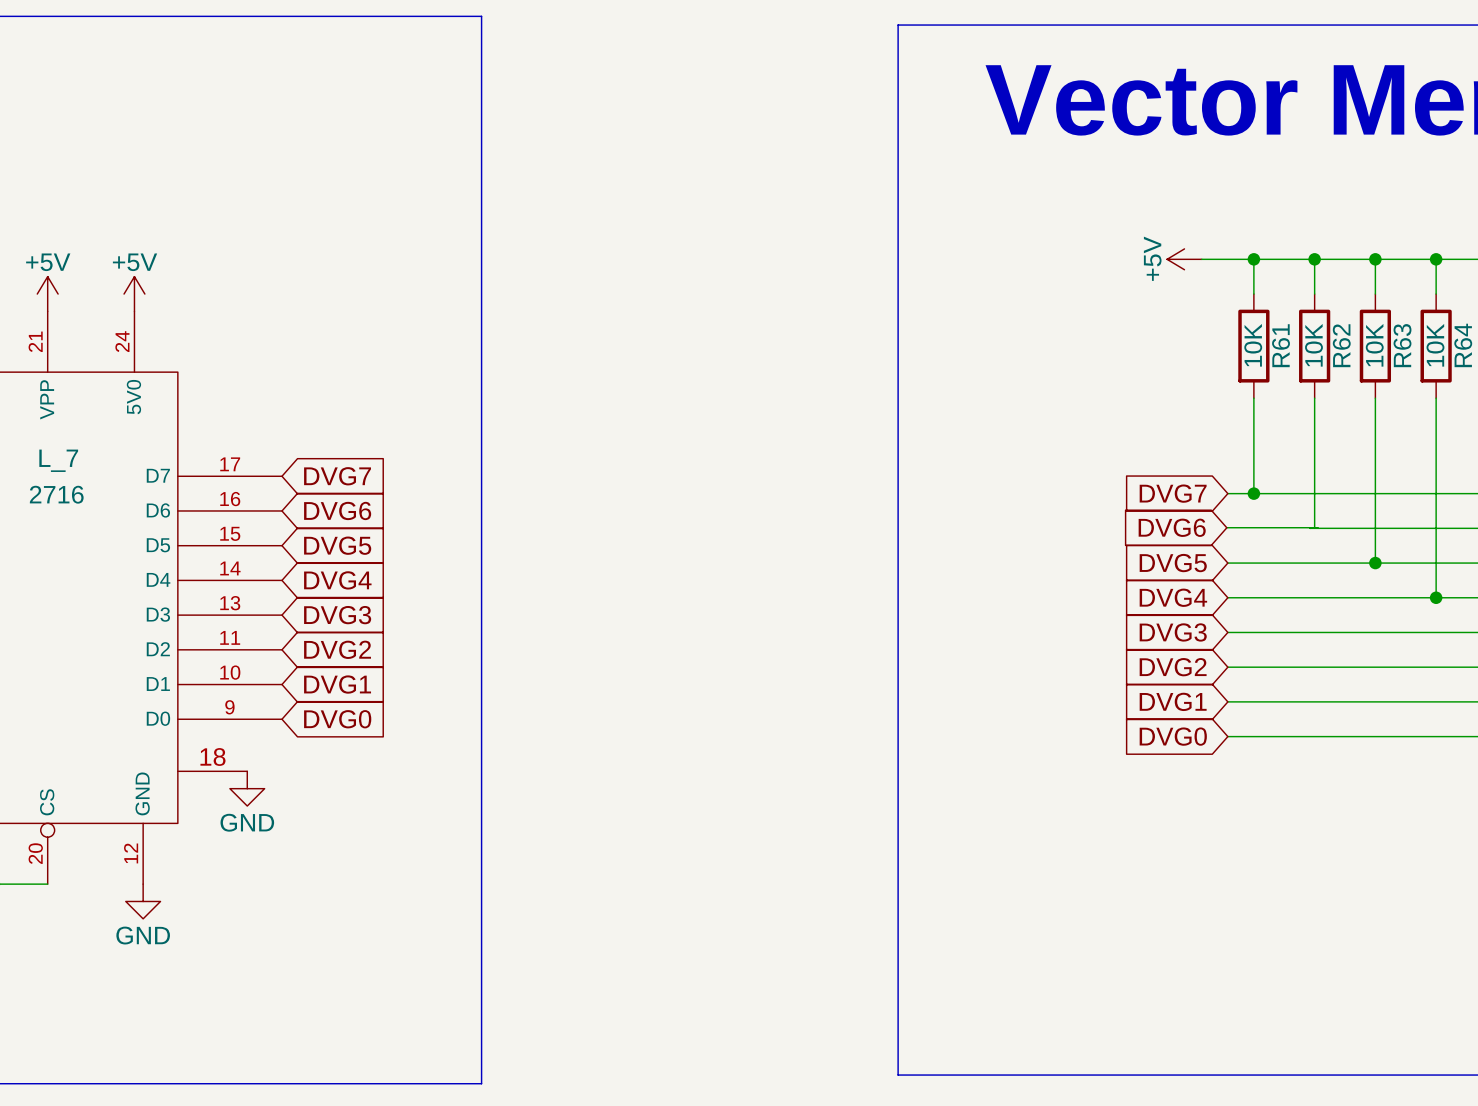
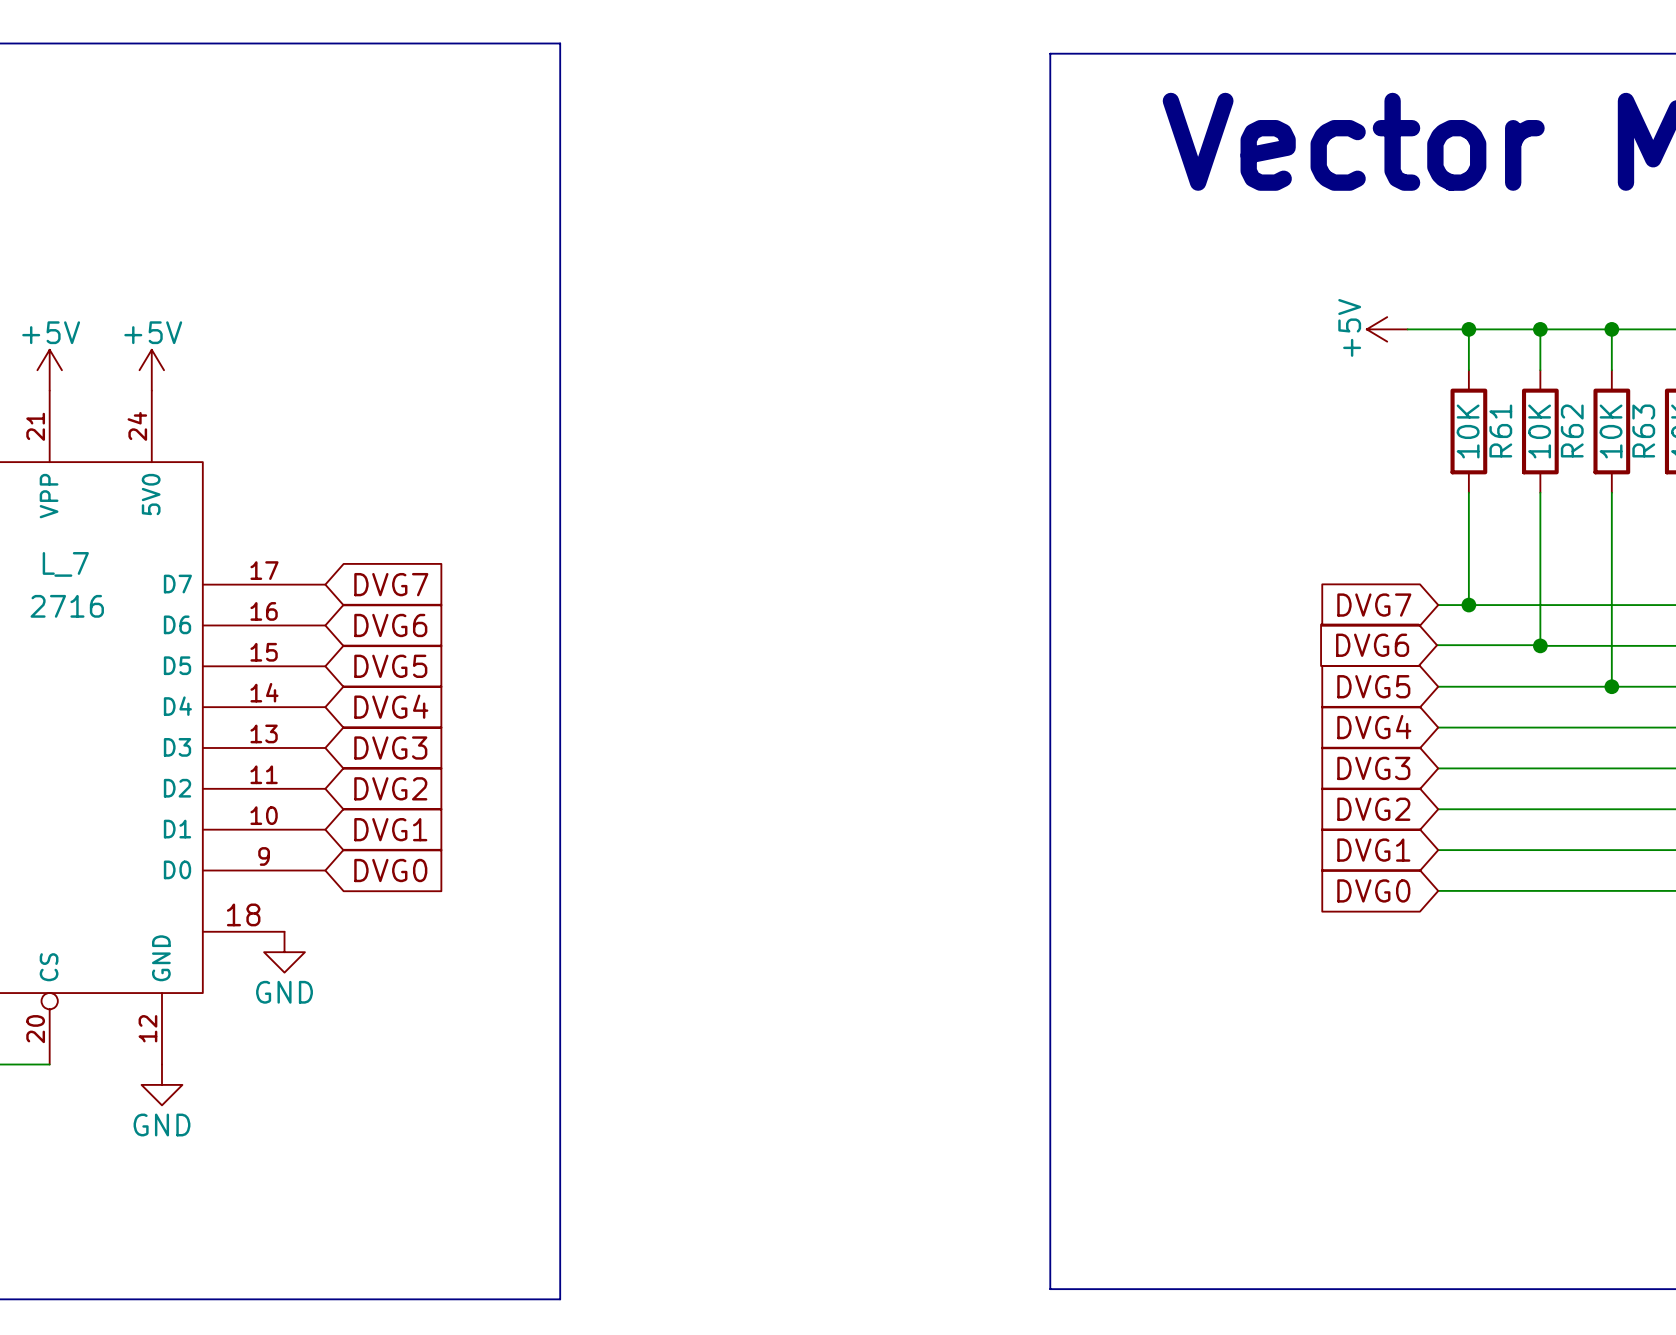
junction: none -> (1540, 645)

